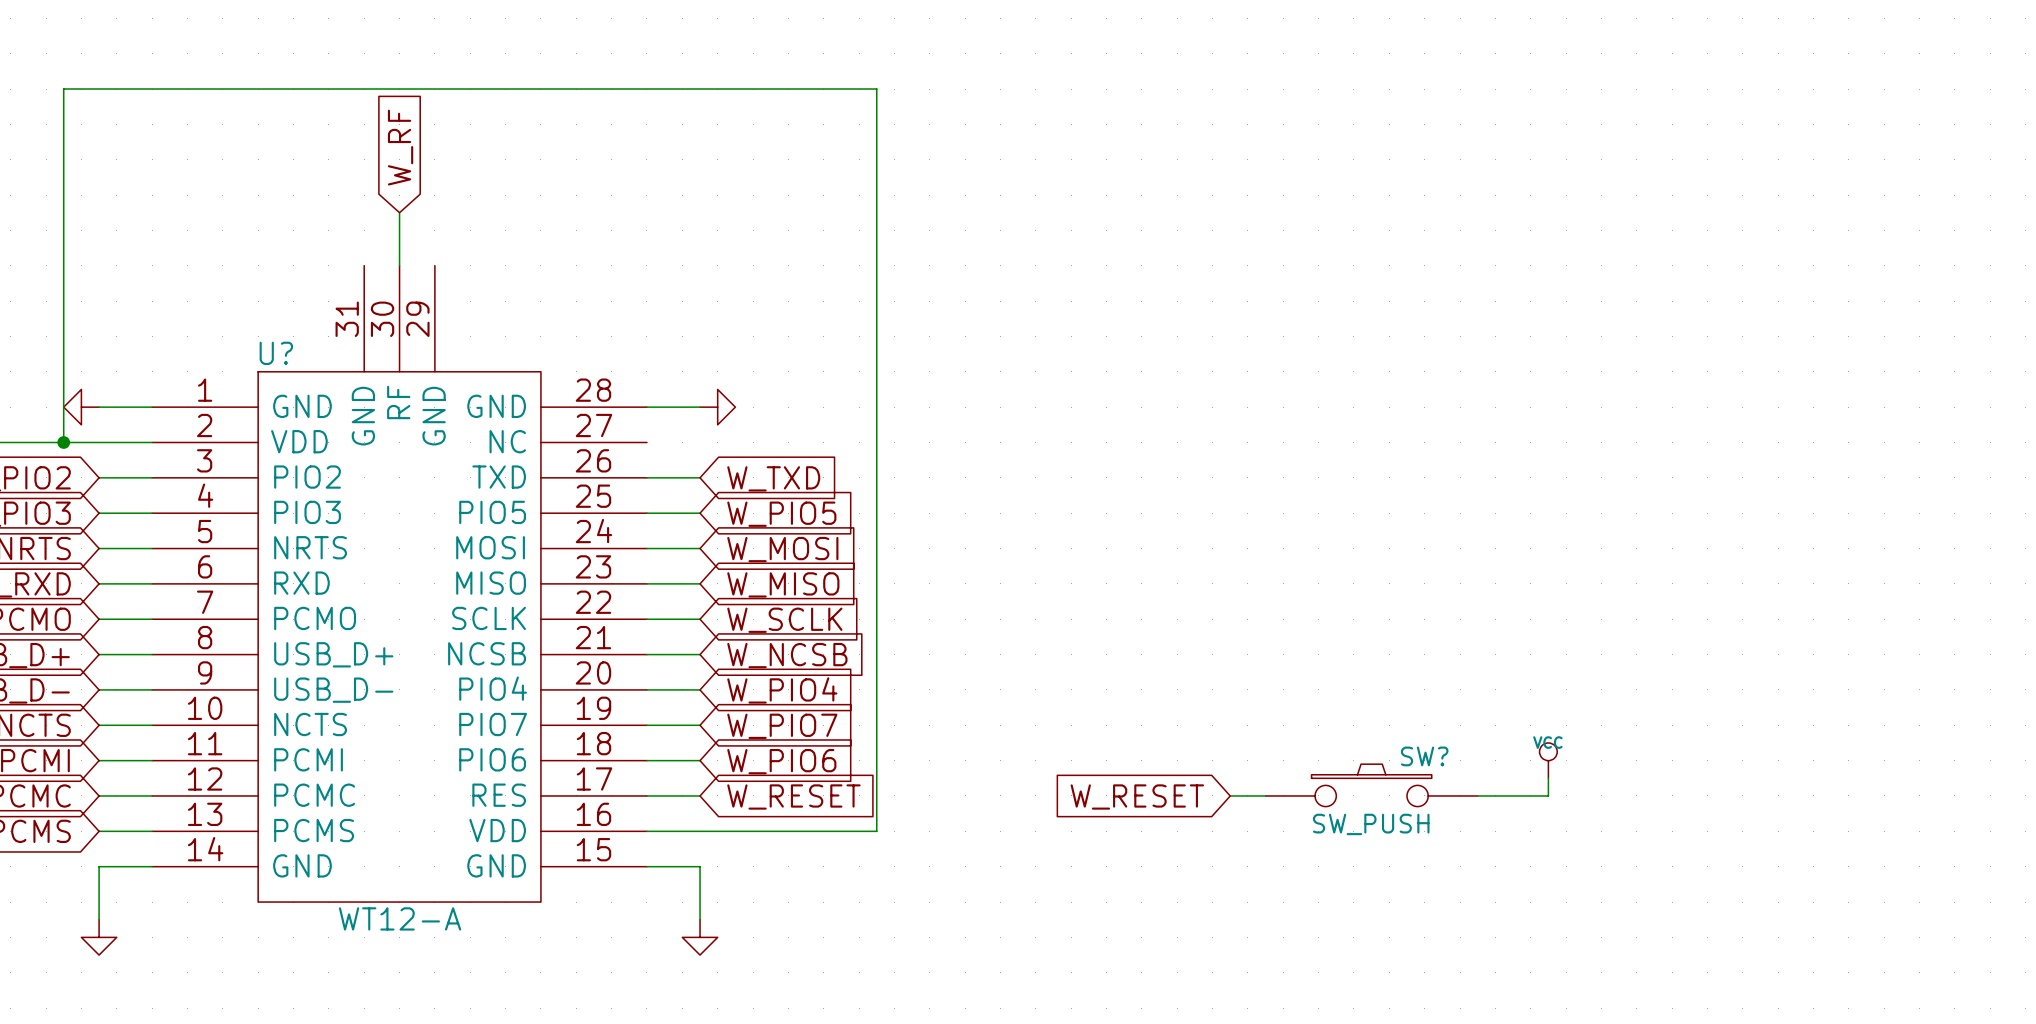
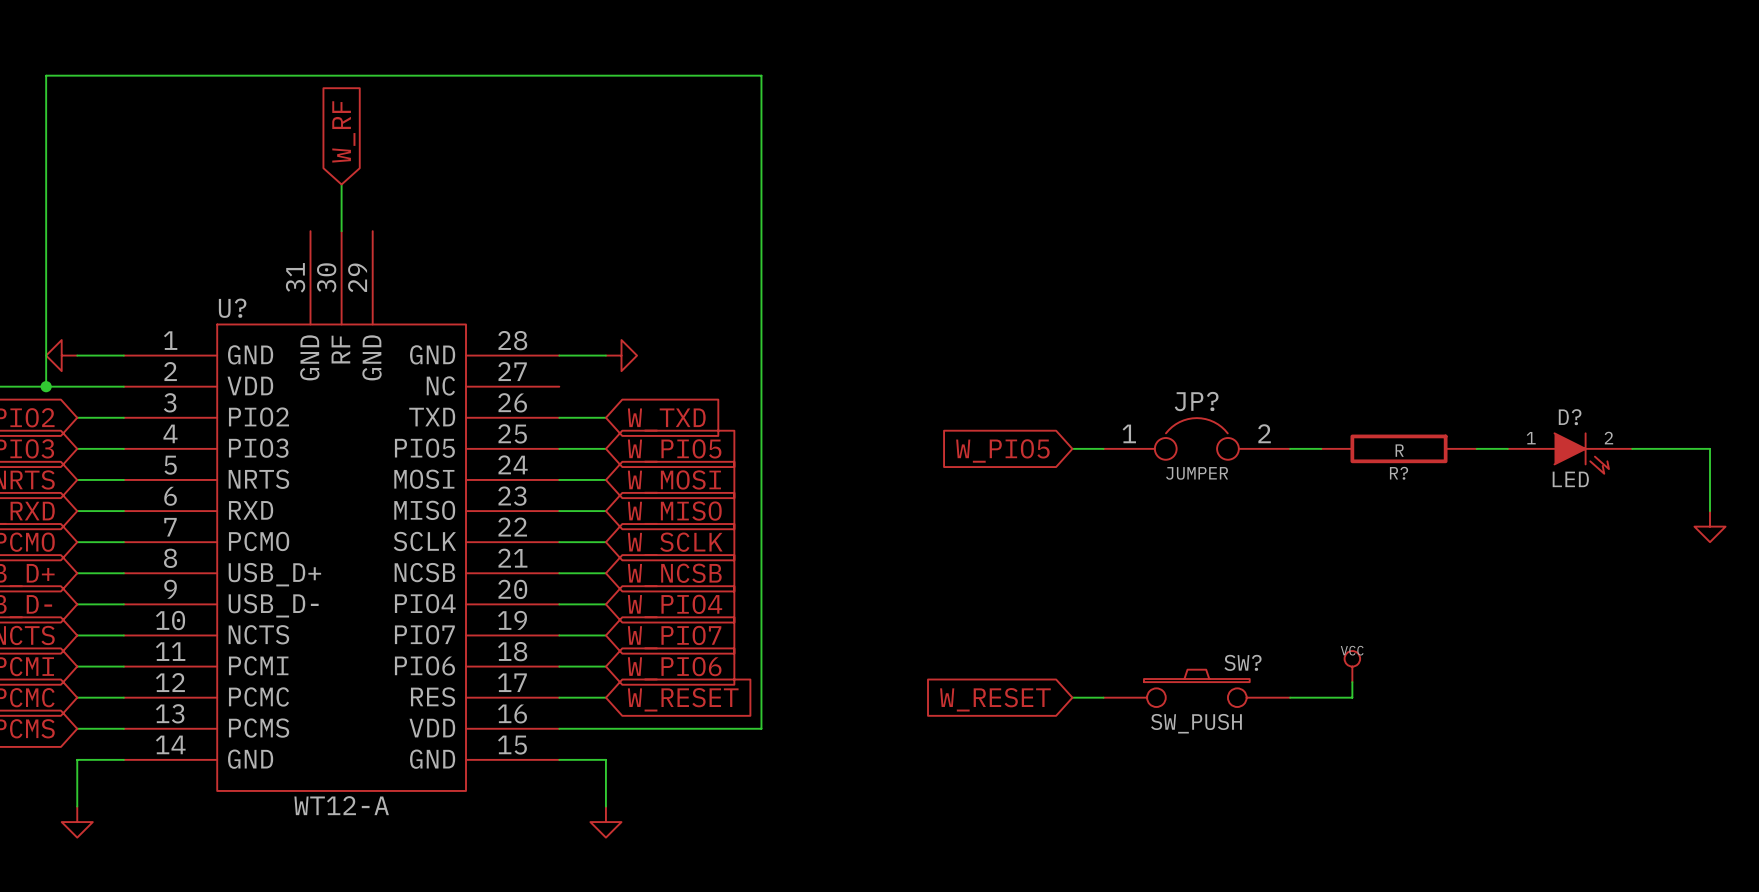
JP?: none -> JUMPER (1196, 438)
wire: none -> (1072, 448) (1103, 448)
wire: none -> (1290, 448) (1321, 448)
R?: none -> R (1399, 448)
wire: none -> (1476, 448) (1507, 448)
wire: none -> (1632, 448) (1710, 448) (1710, 511)
global label: none -> W_PIO5 (1002, 450)
D?: none -> LED (1570, 453)
power symbol: none -> (1710, 526)

